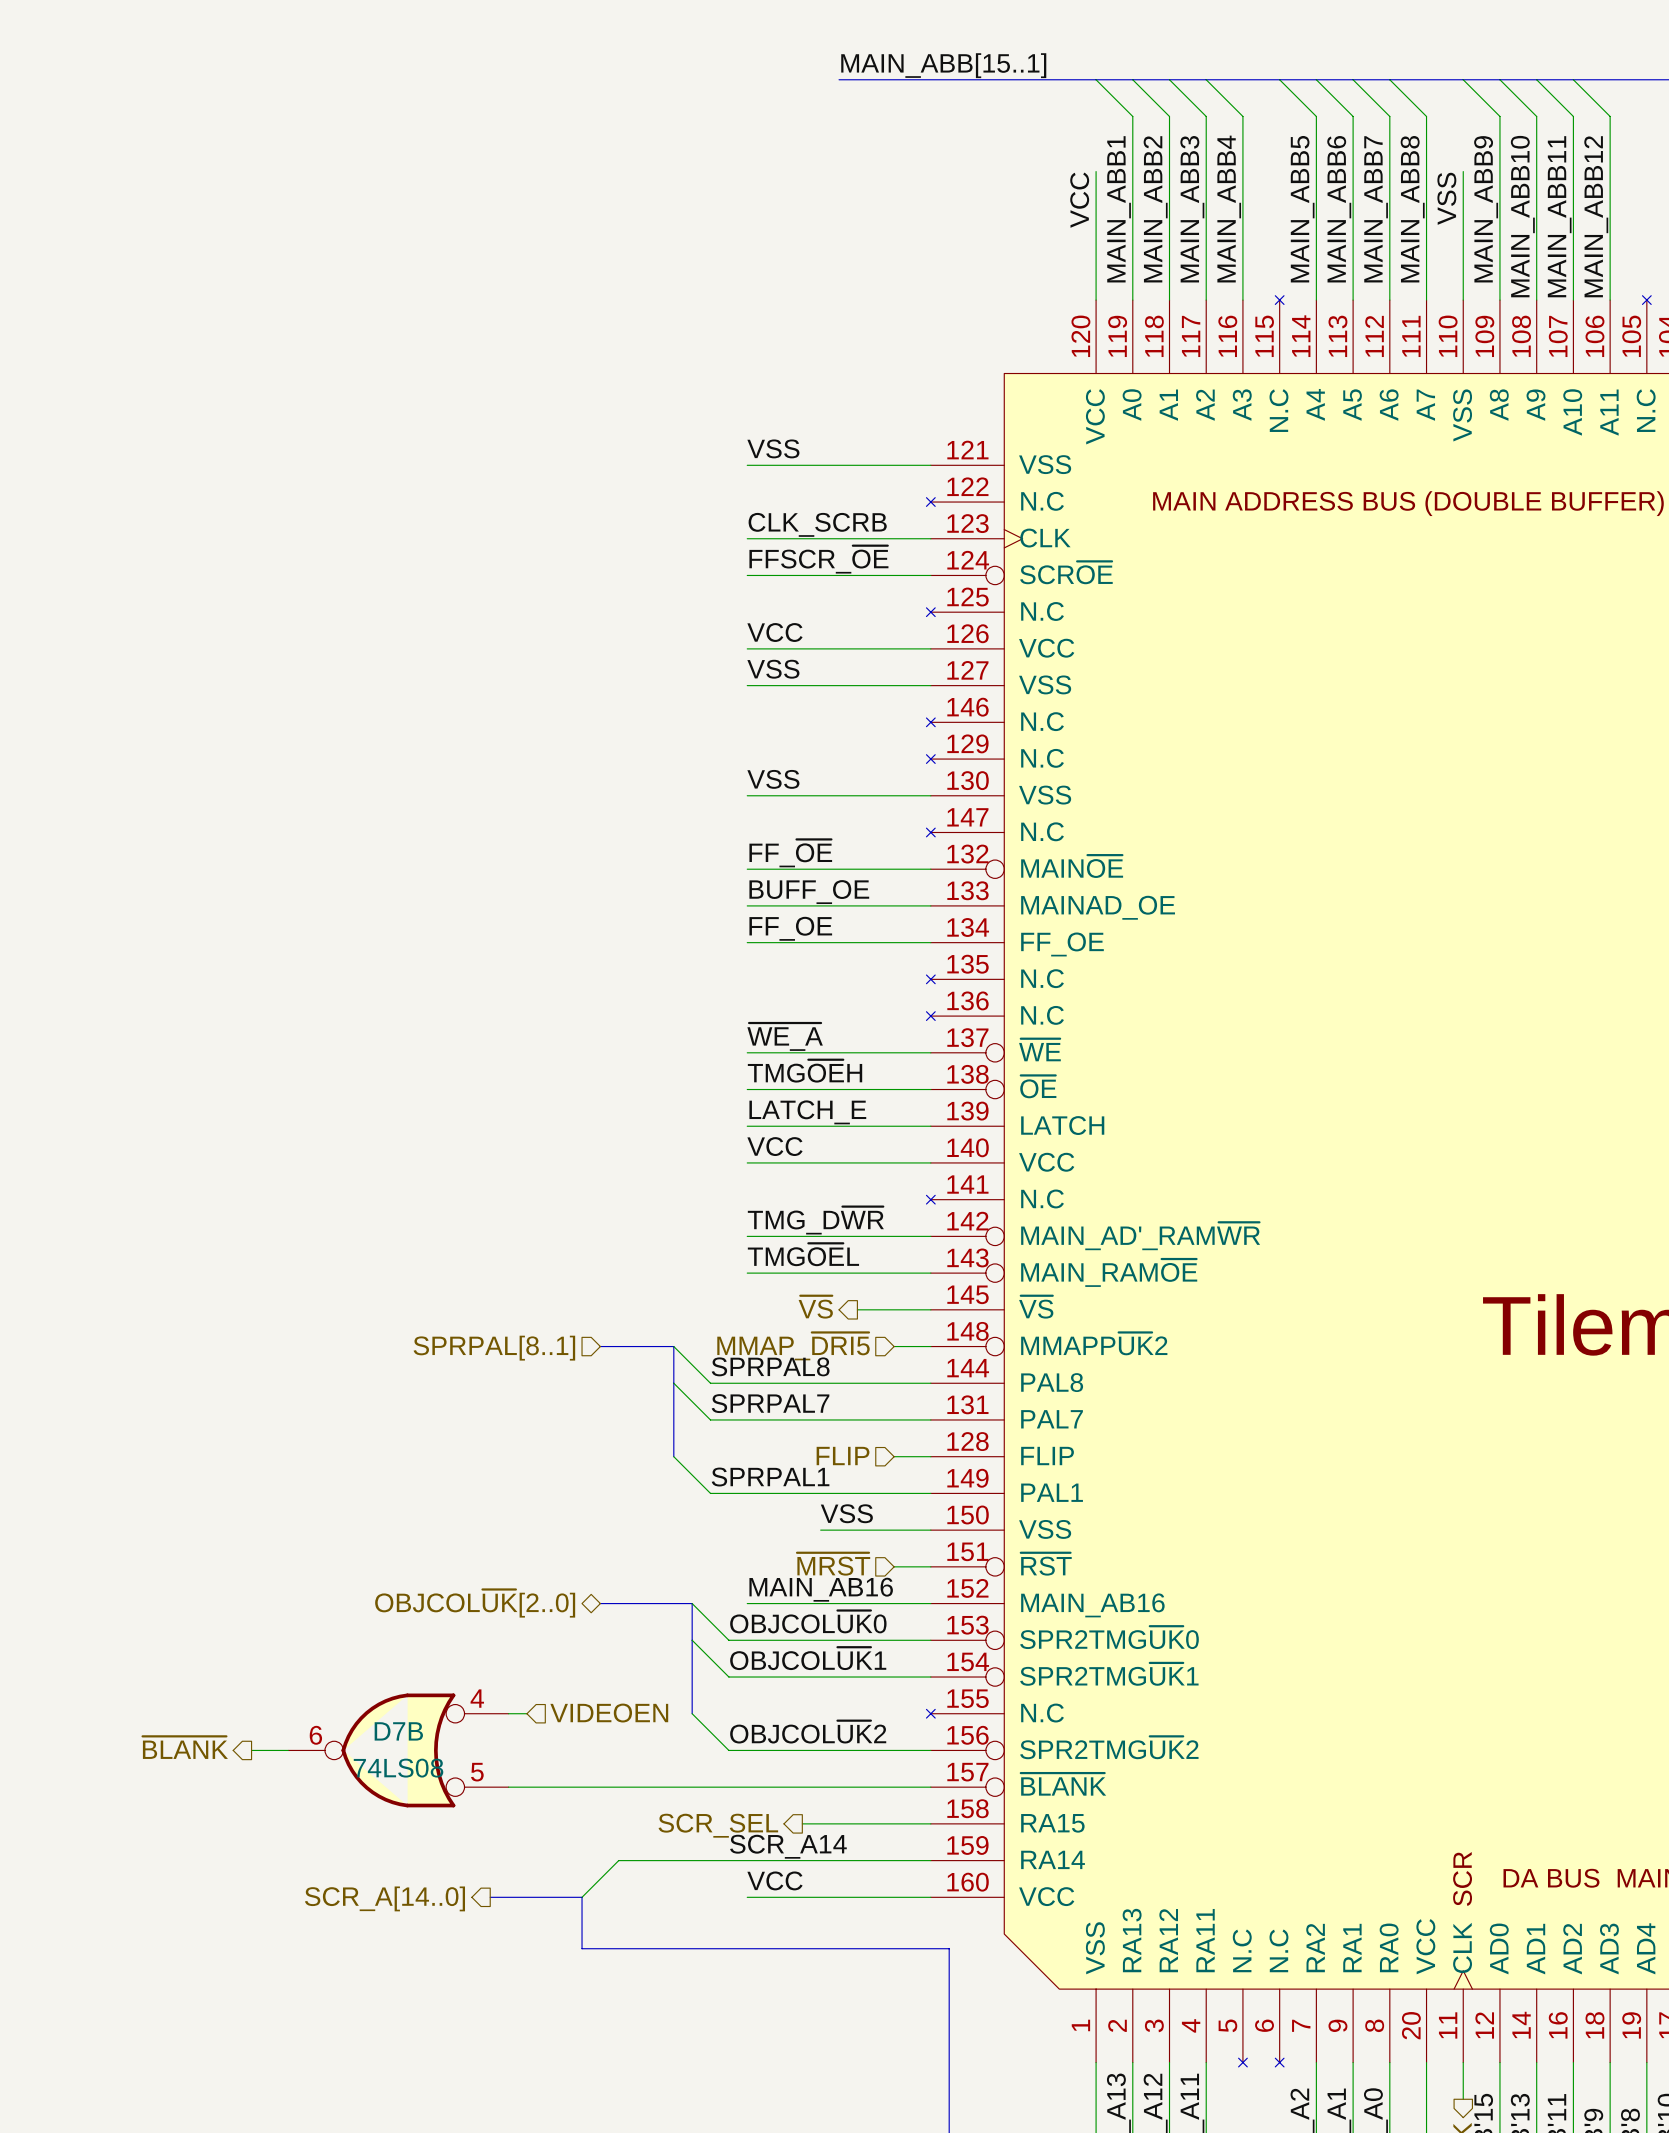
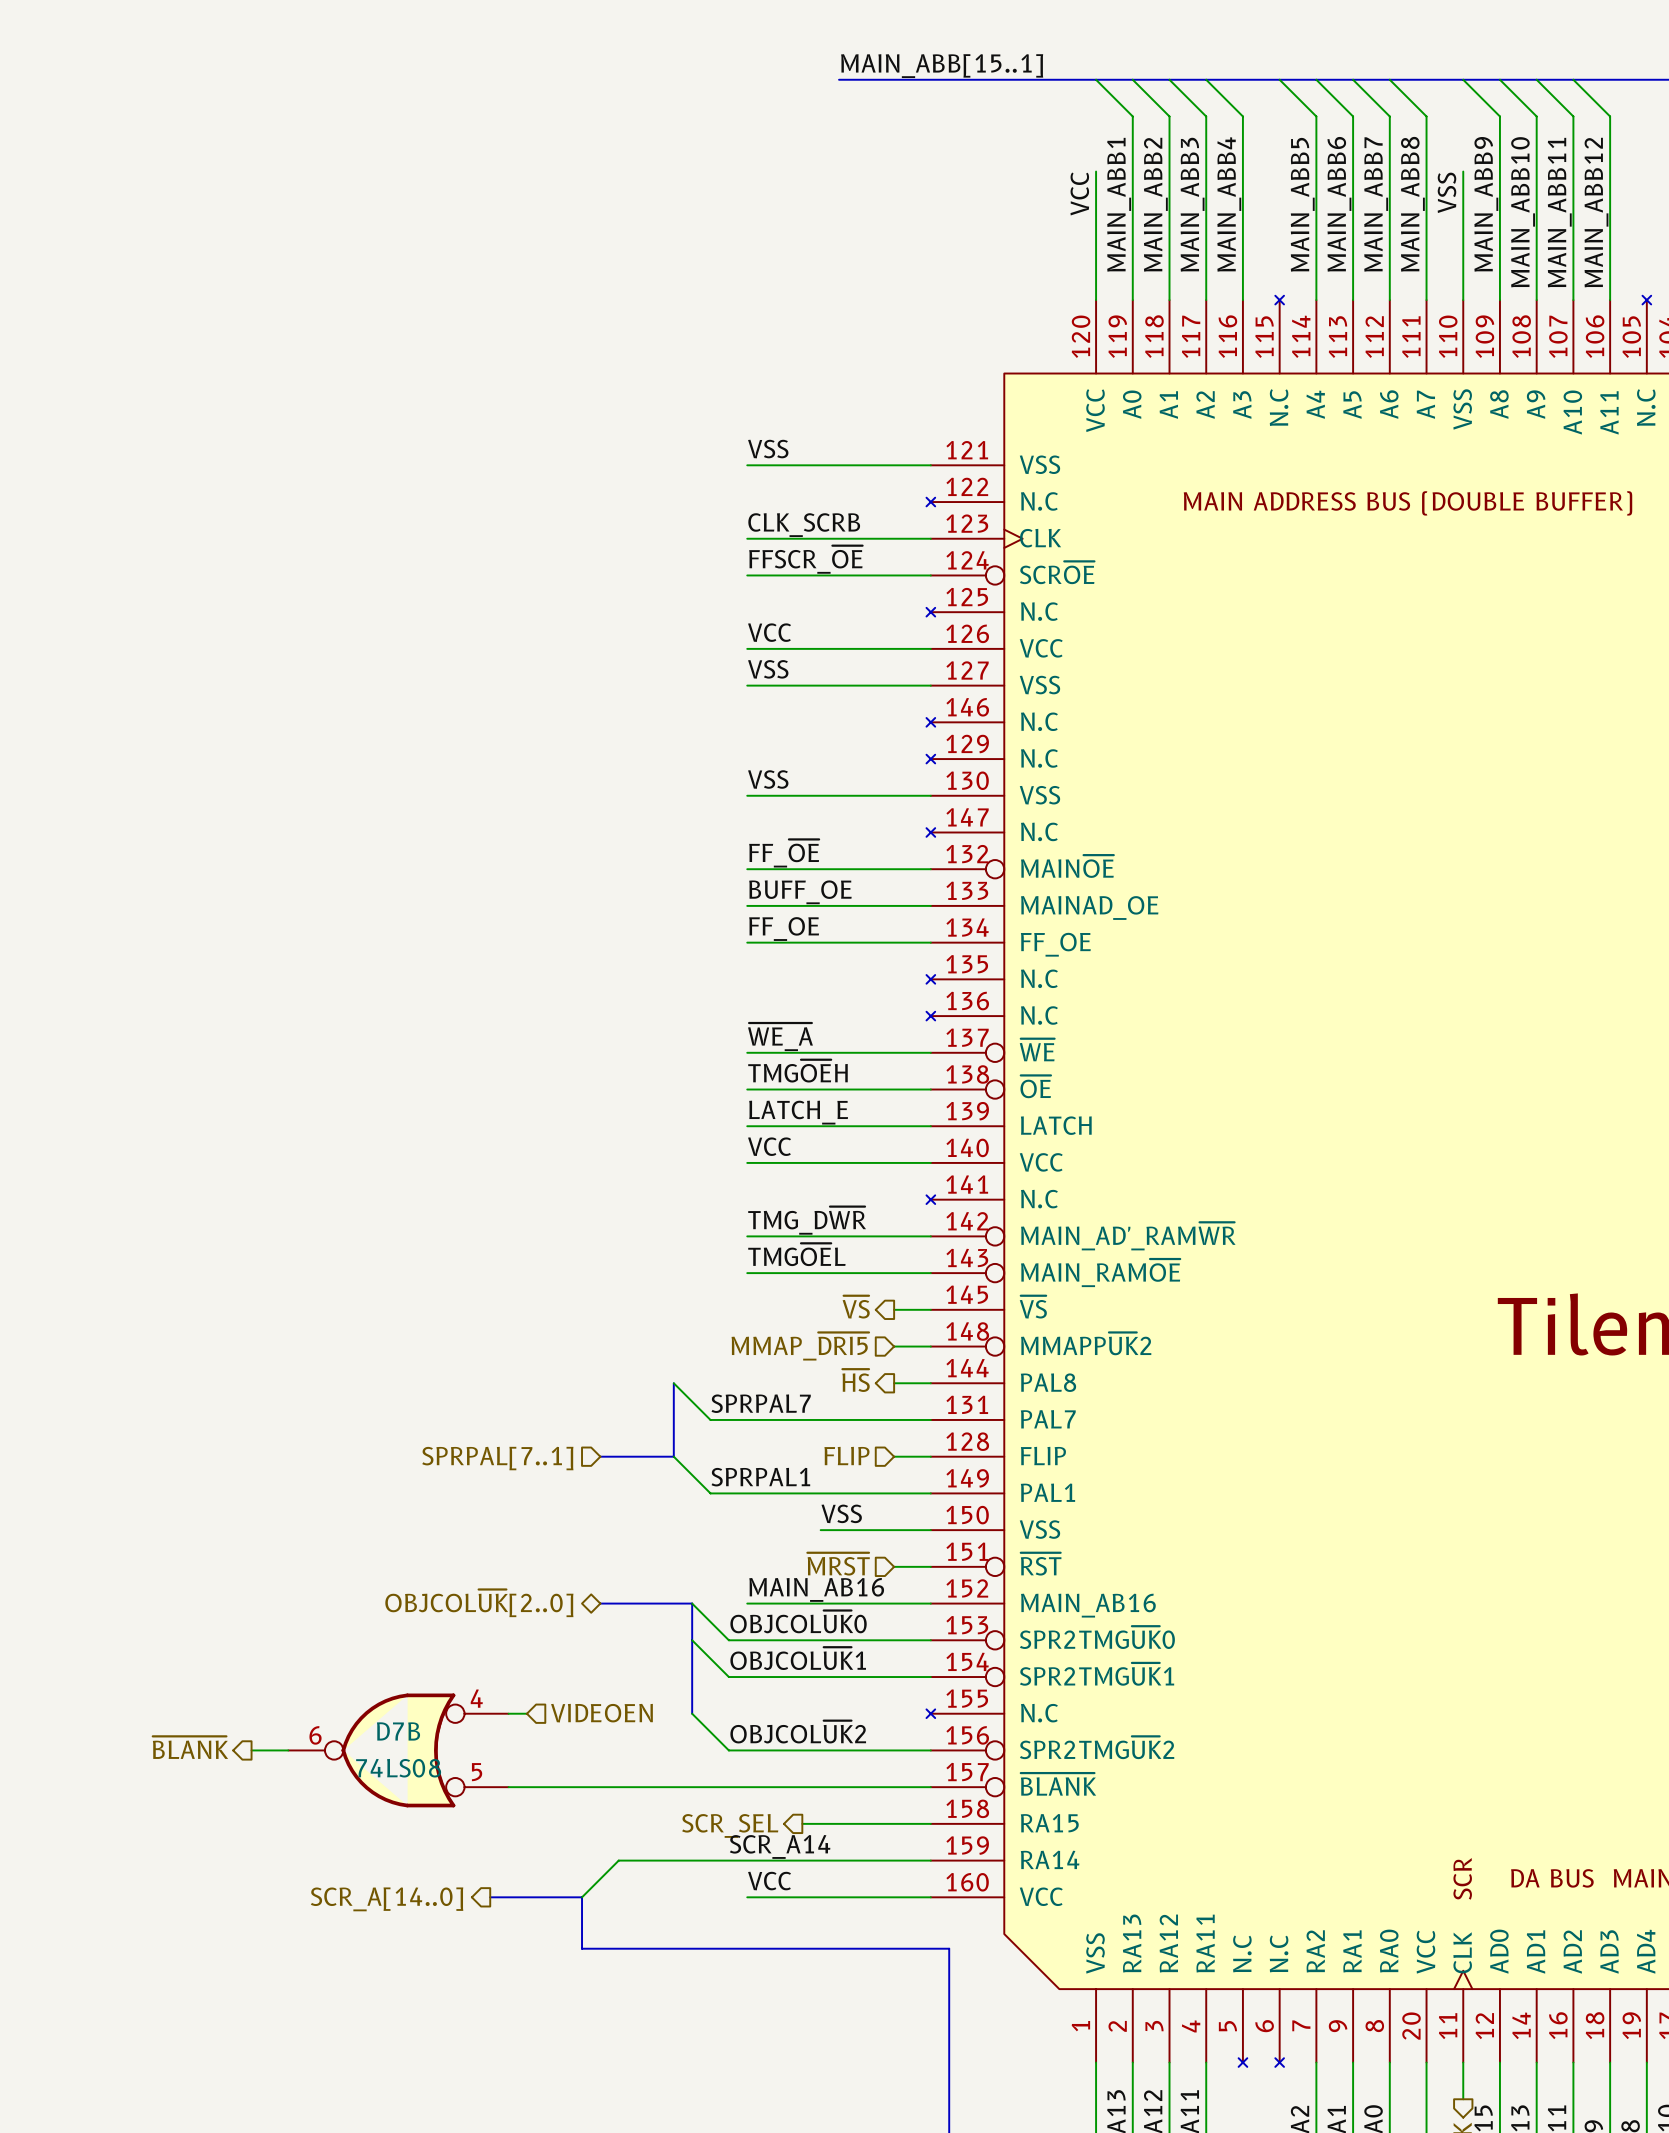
hierarchical label position: ~{VS} (815, 1307) -> ~{VS} (856, 1307)
wire: (857, 1309) (894, 1309) -> none
bus: (600, 1346) (673, 1346) (673, 1383) -> none
wire: (673, 1346) (710, 1383) (894, 1383) -> none
hierarchical label: SPRPAL[8..1] (494, 1348) -> none
label: SPRPAL8 (770, 1366) -> none
hierarchical label: none -> ~{HS} (856, 1380)
bus: none -> (600, 1456) (673, 1456)
hierarchical label: none -> SPRPAL[7..1] (497, 1458)

